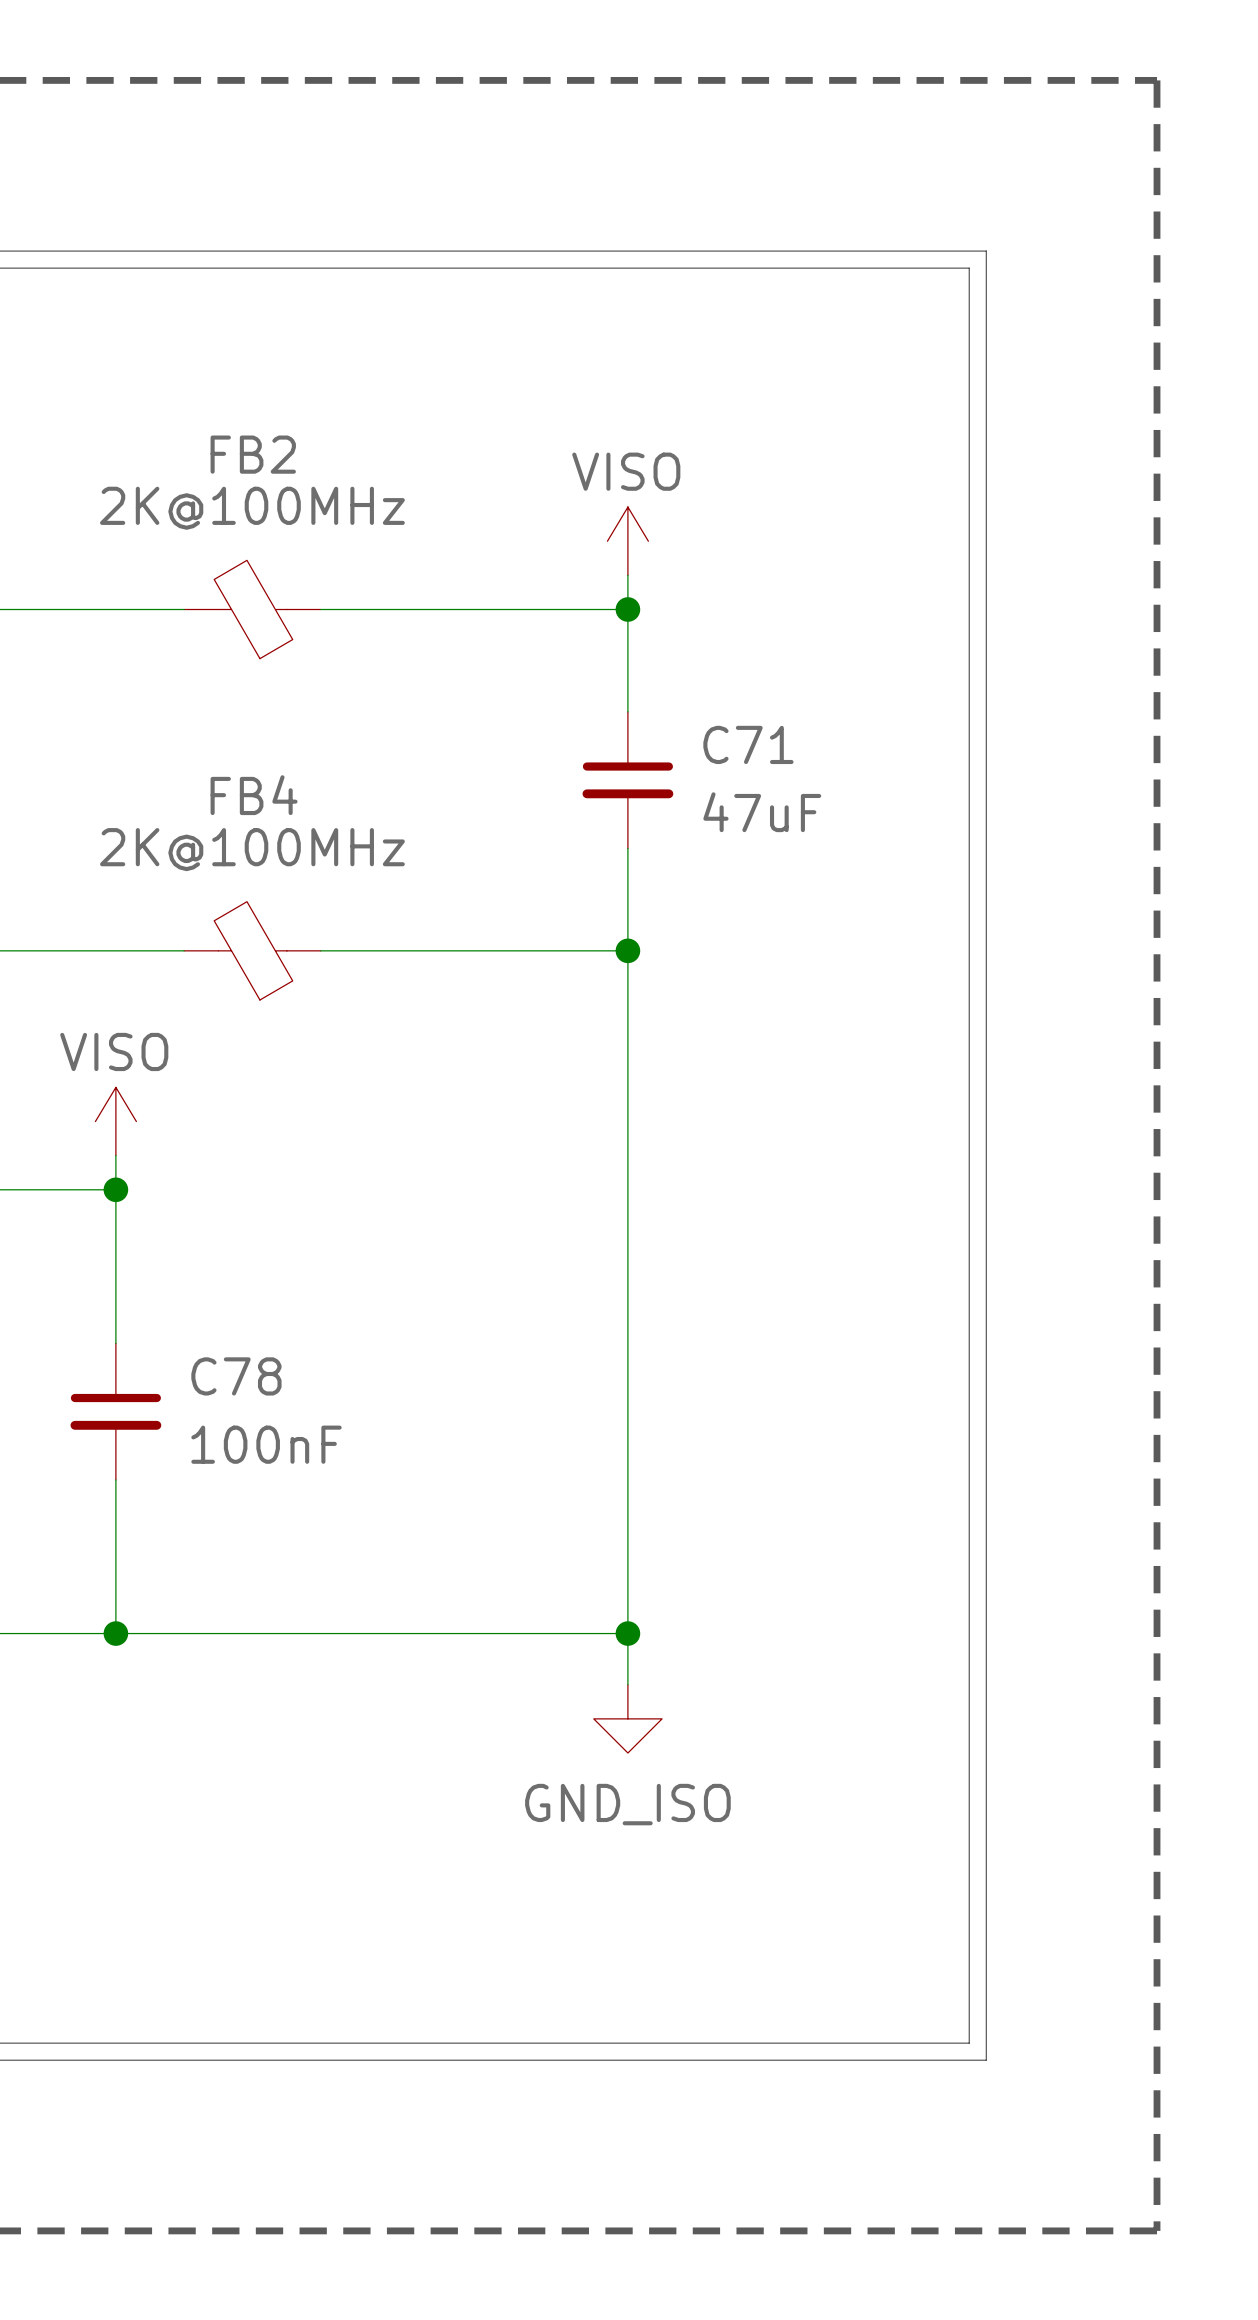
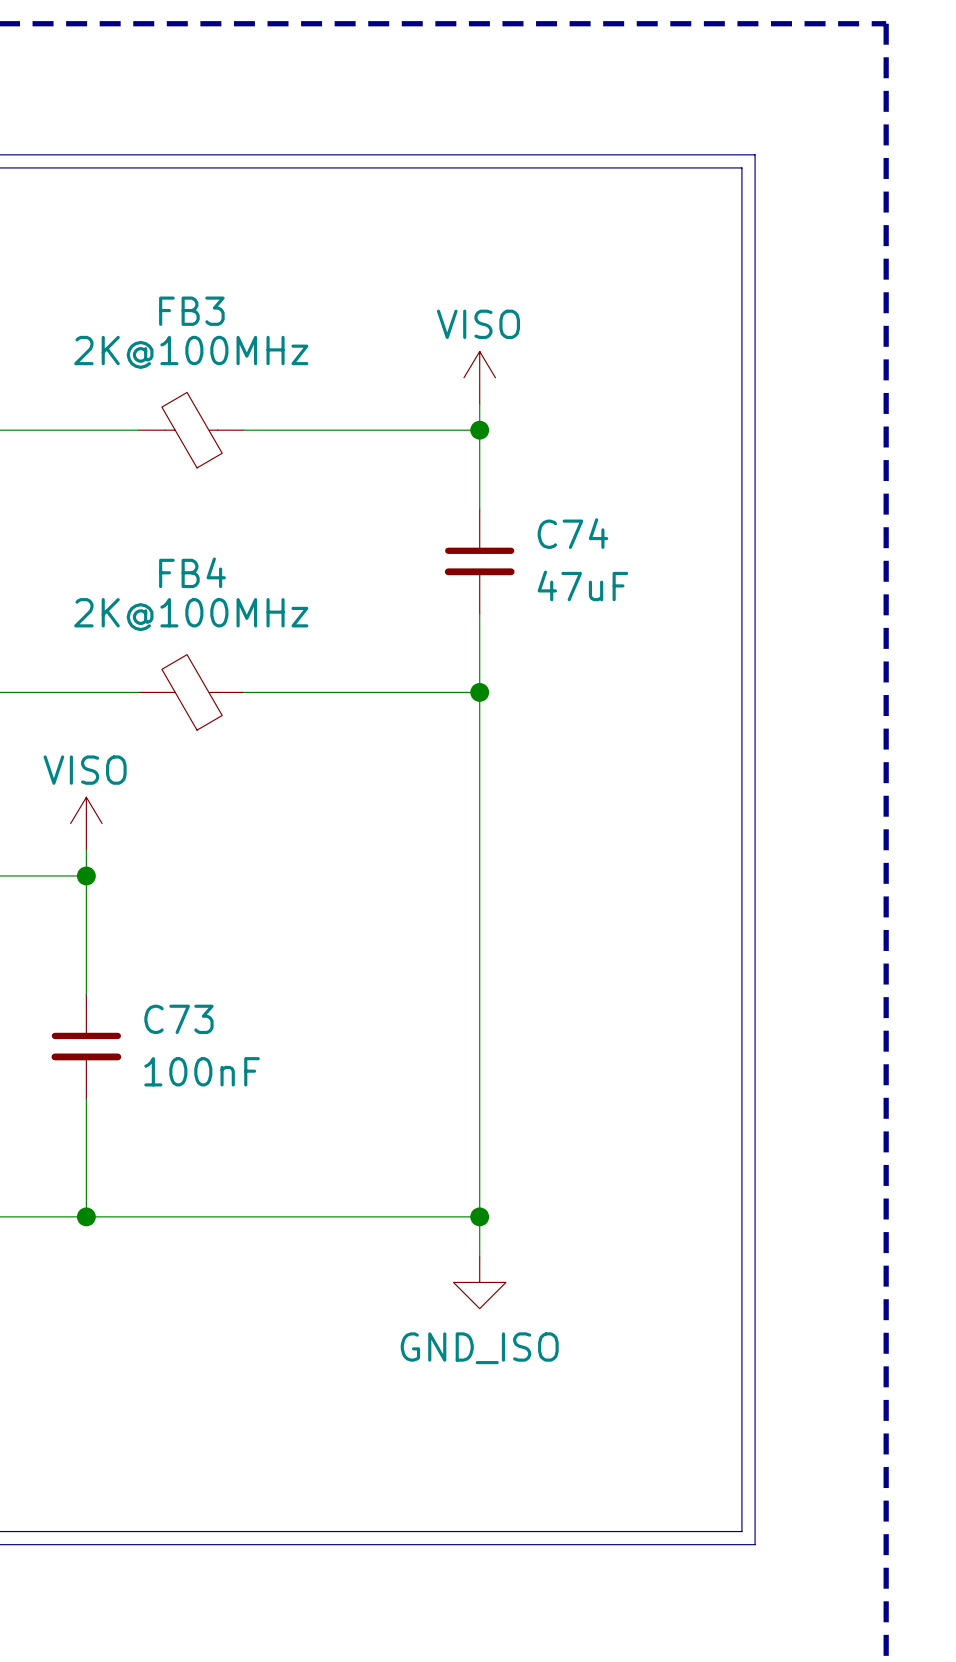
FB2 name: FB2 (253, 454) -> FB3 (191, 311)
C71 name: C71 (748, 744) -> C74 (572, 533)
C78 name: C78 (236, 1376) -> C73 (178, 1019)

